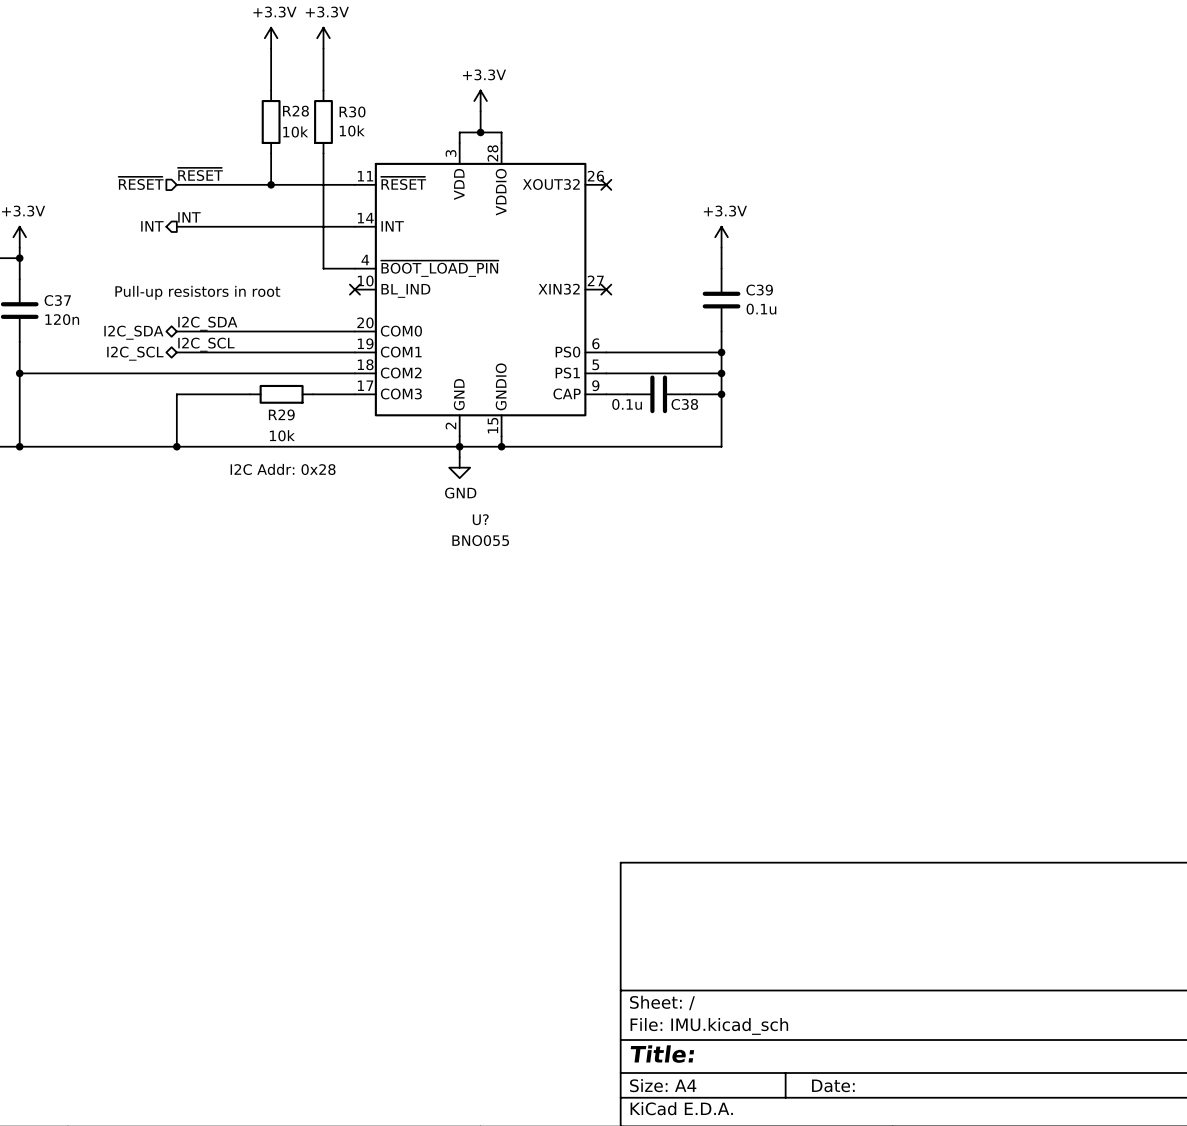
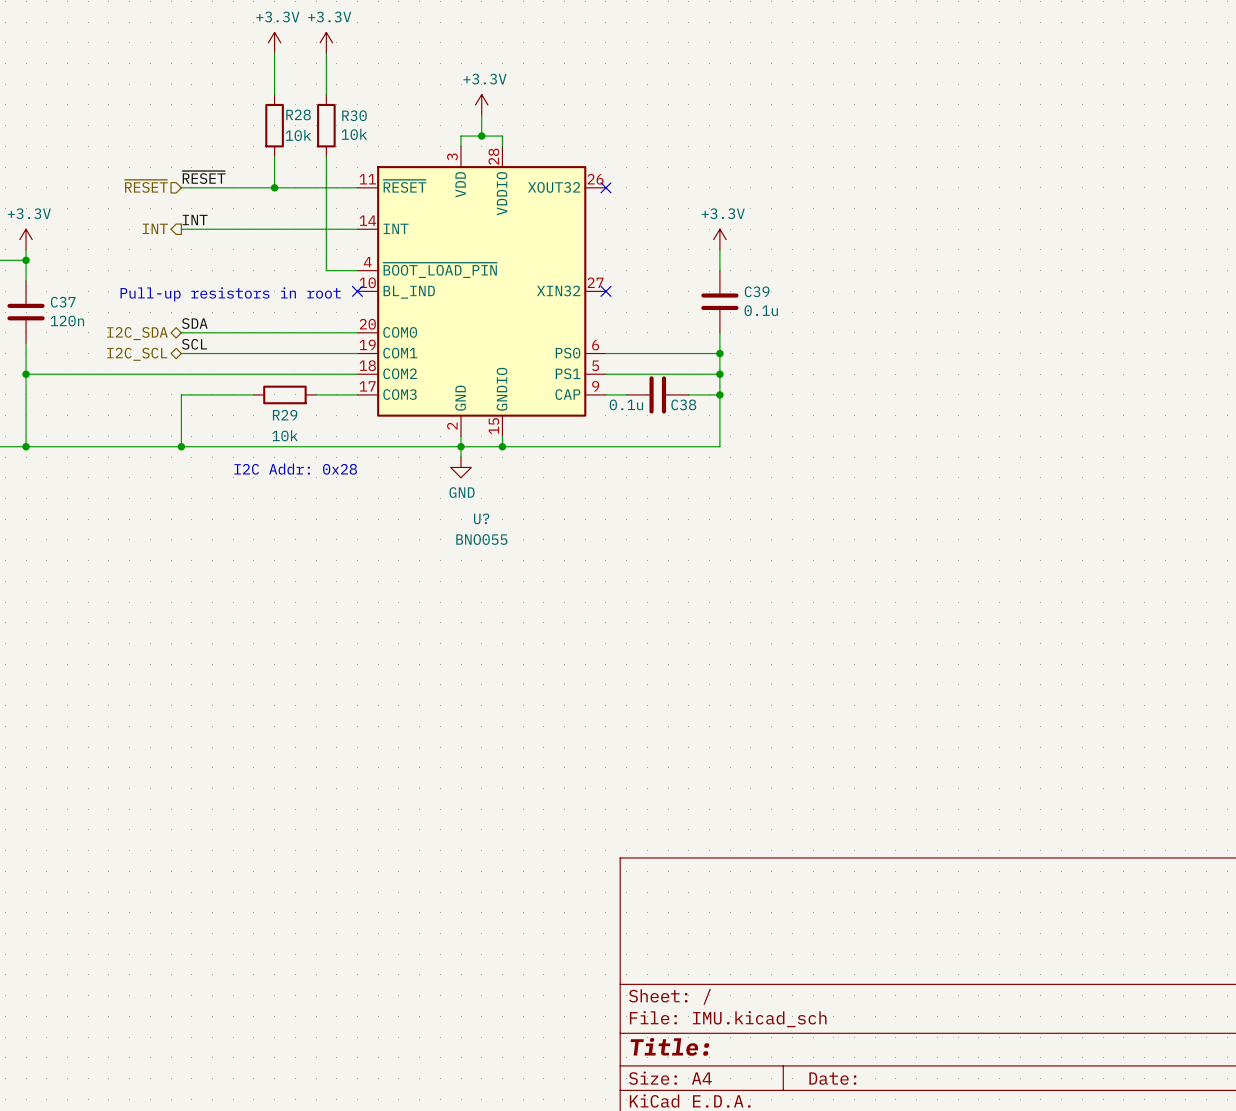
label: I2C_SDA (207, 323) -> SDA (194, 323)
label: I2C_SCL (206, 344) -> SCL (194, 344)

